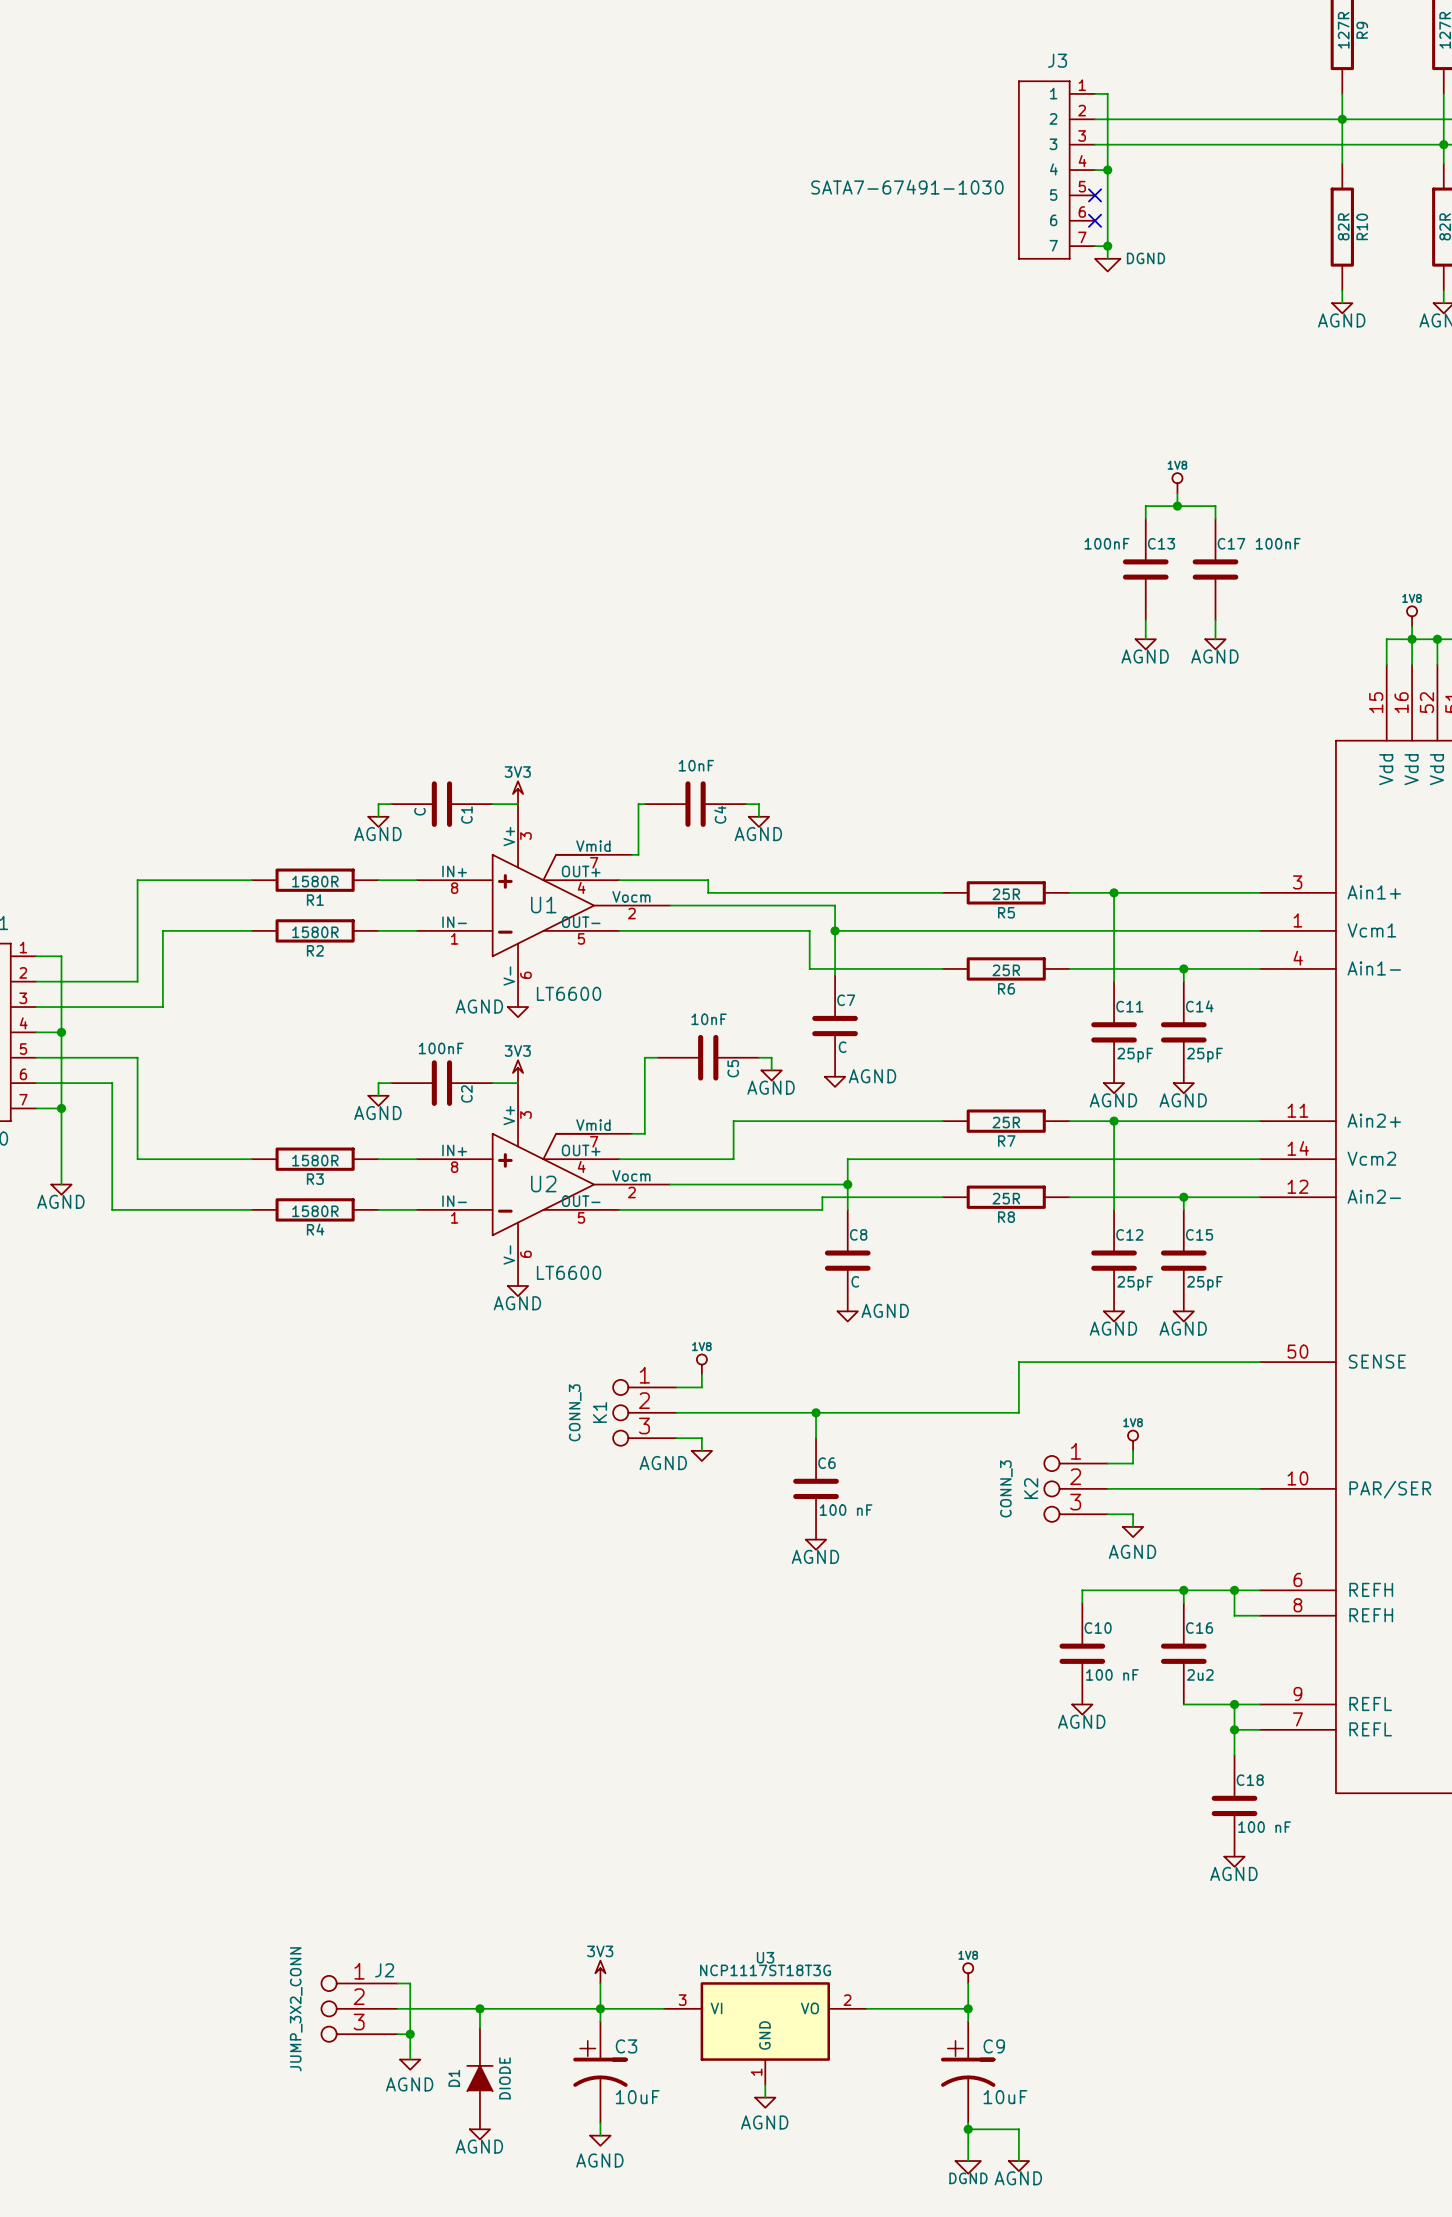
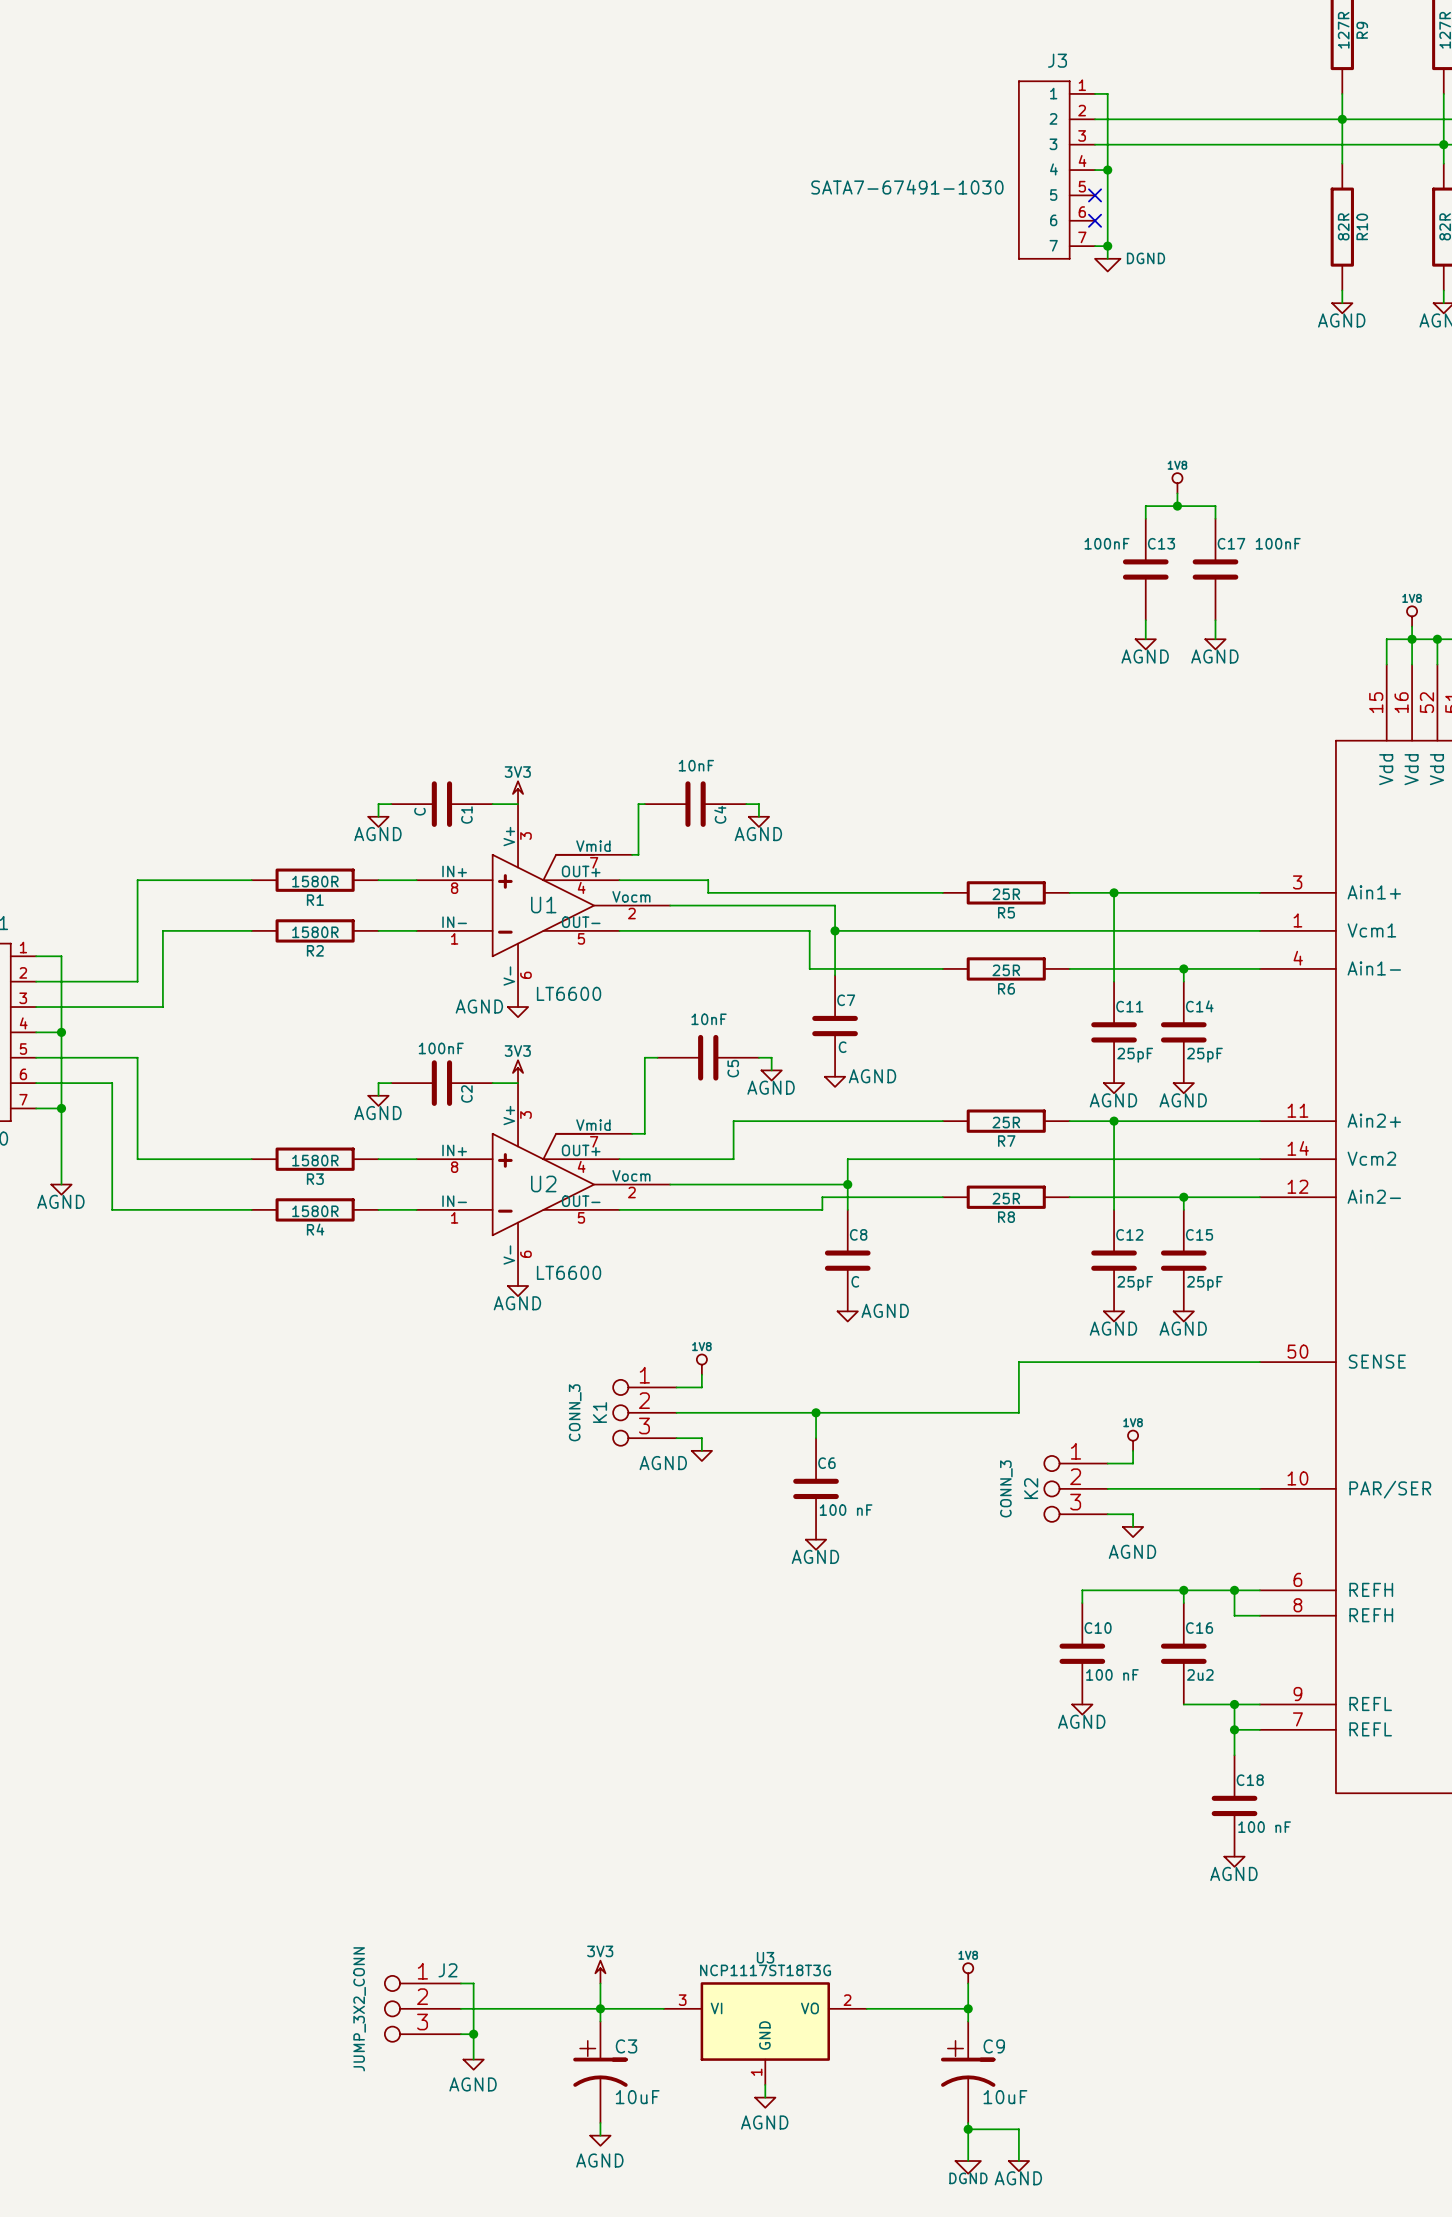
wire: (397, 1983) (410, 1983) (410, 2059) -> (460, 1983) (473, 1983) (473, 2059)
J2 position: (359, 2008) -> (422, 2008)
wire: (479, 2008) (479, 2027) -> none
junction position: (479, 2008) -> (473, 2034)
junction: (410, 2034) -> none
power symbol: AGND (410, 2064) -> none
power symbol: none -> AGND (473, 2064)
D1: DIODE (479, 2078) -> none
power symbol: AGND (479, 2134) -> none

